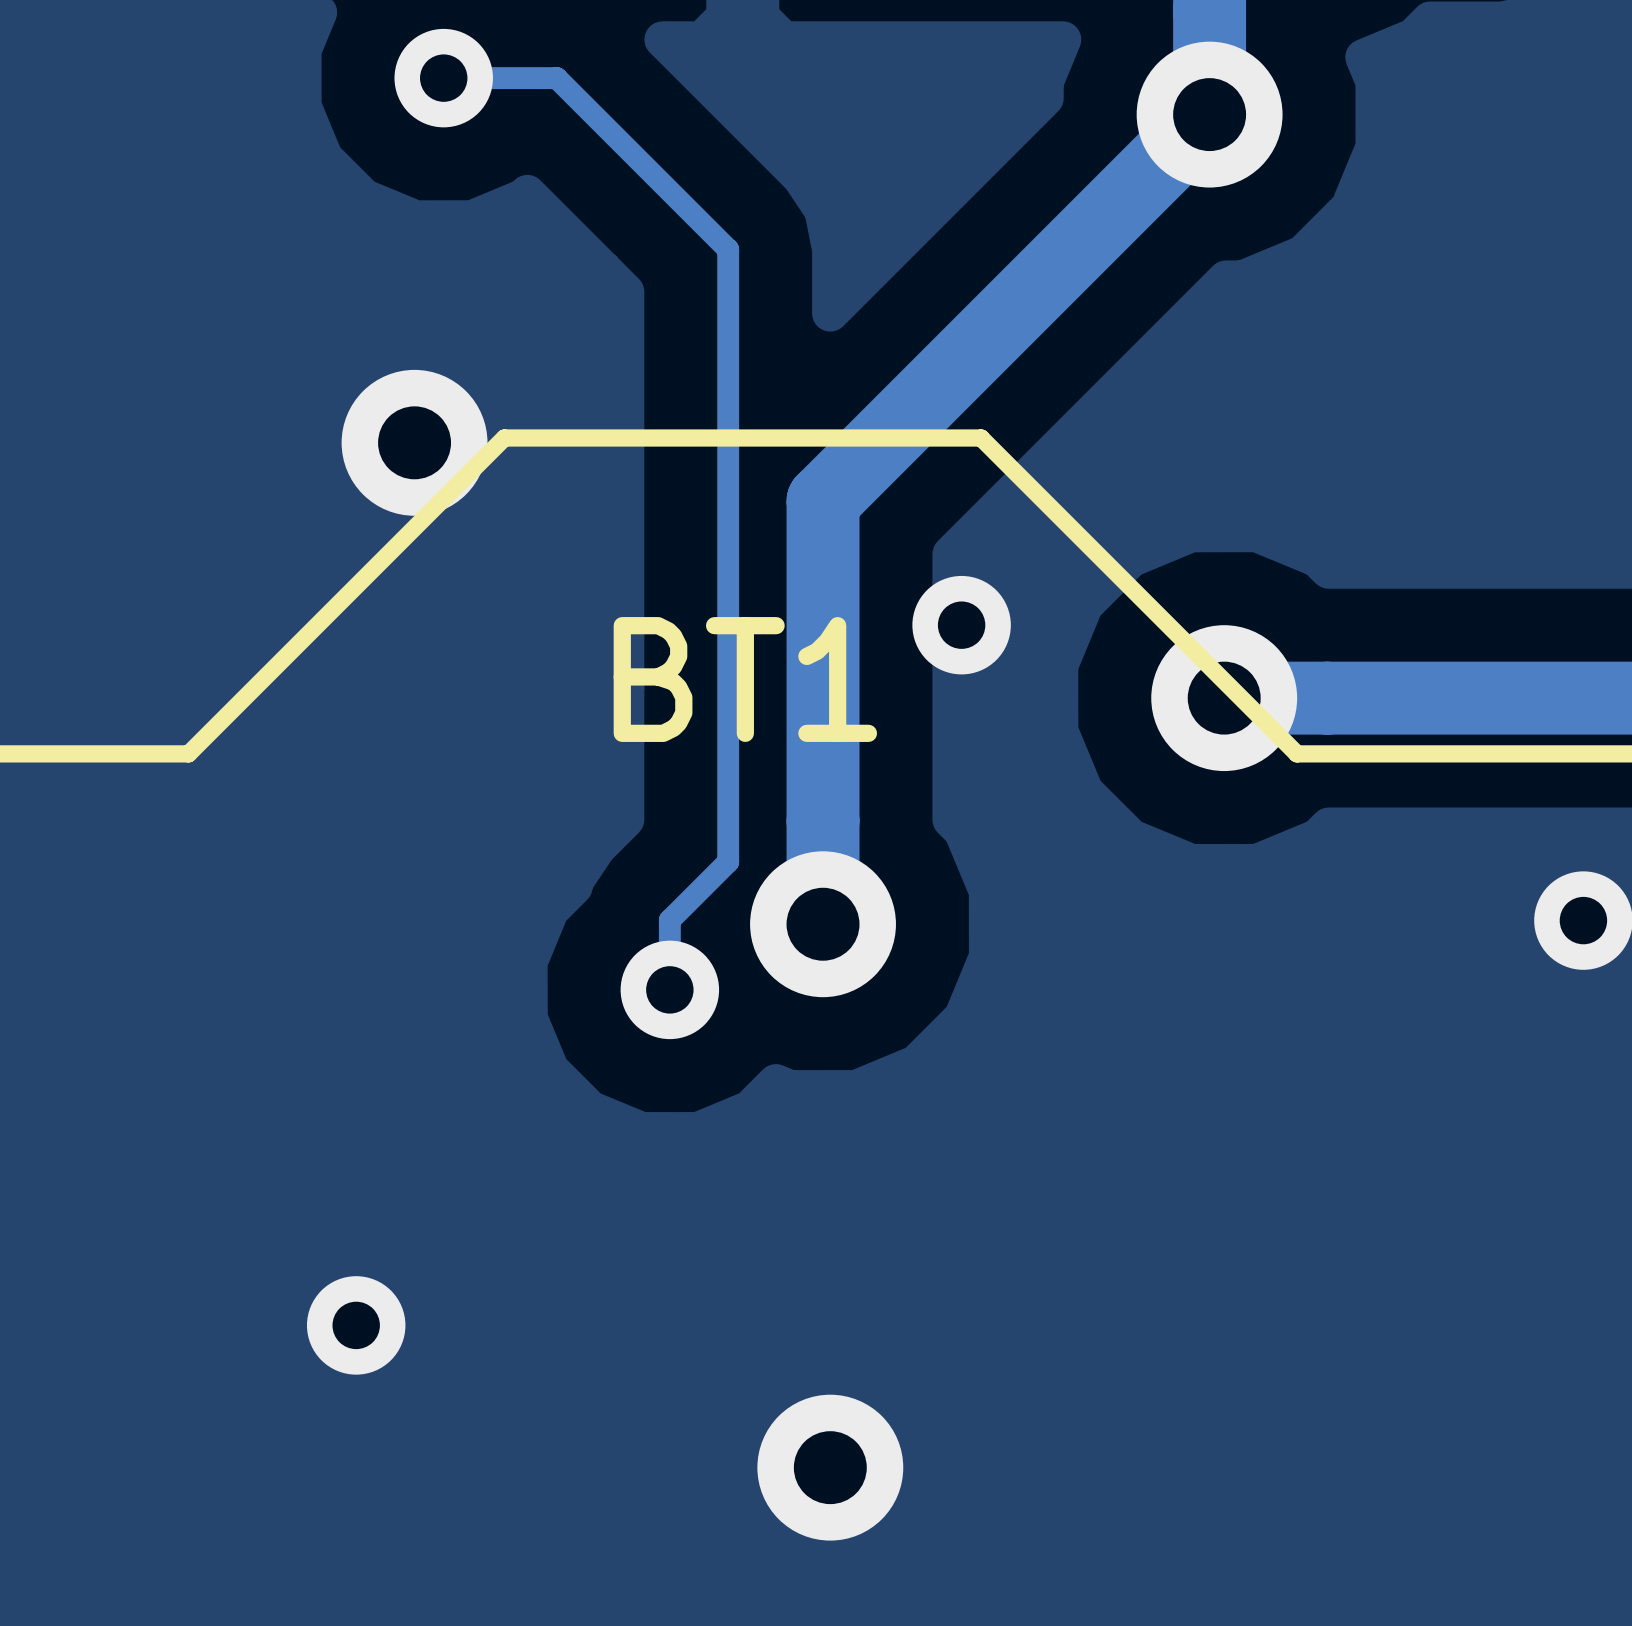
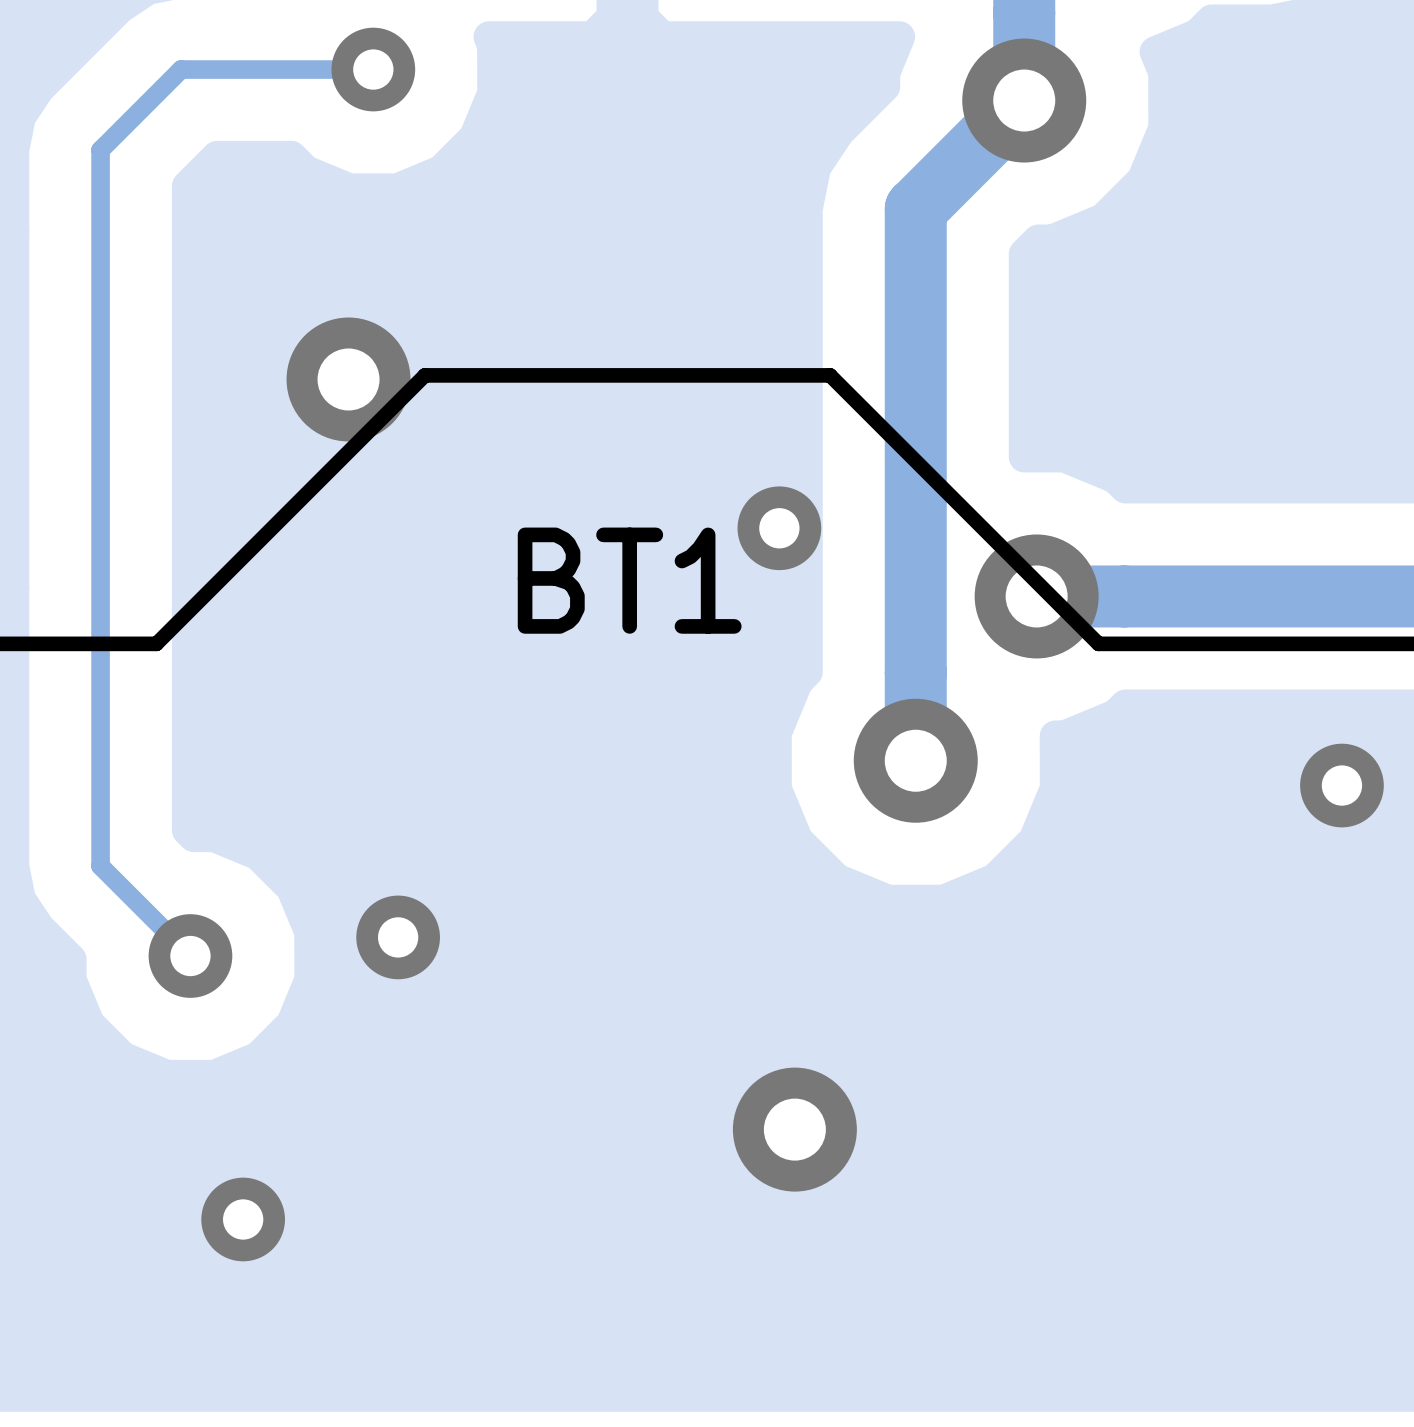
track: (443, 78) (556, 78) (728, 249) (728, 861) (669, 920) (669, 989) -> (373, 69) (181, 69) (100, 150) (100, 866) (190, 956)
track: (1081, 242) (823, 501) (823, 924) -> (915, 209) (915, 760)
via position: (961, 625) -> (779, 528)
via: none -> (915, 760)
via: (823, 924) -> none
via: (669, 989) -> none
via: none -> (398, 937)
via: none -> (190, 956)
via: (356, 1325) -> none
via: none -> (243, 1219)
via position: (830, 1467) -> (794, 1129)

